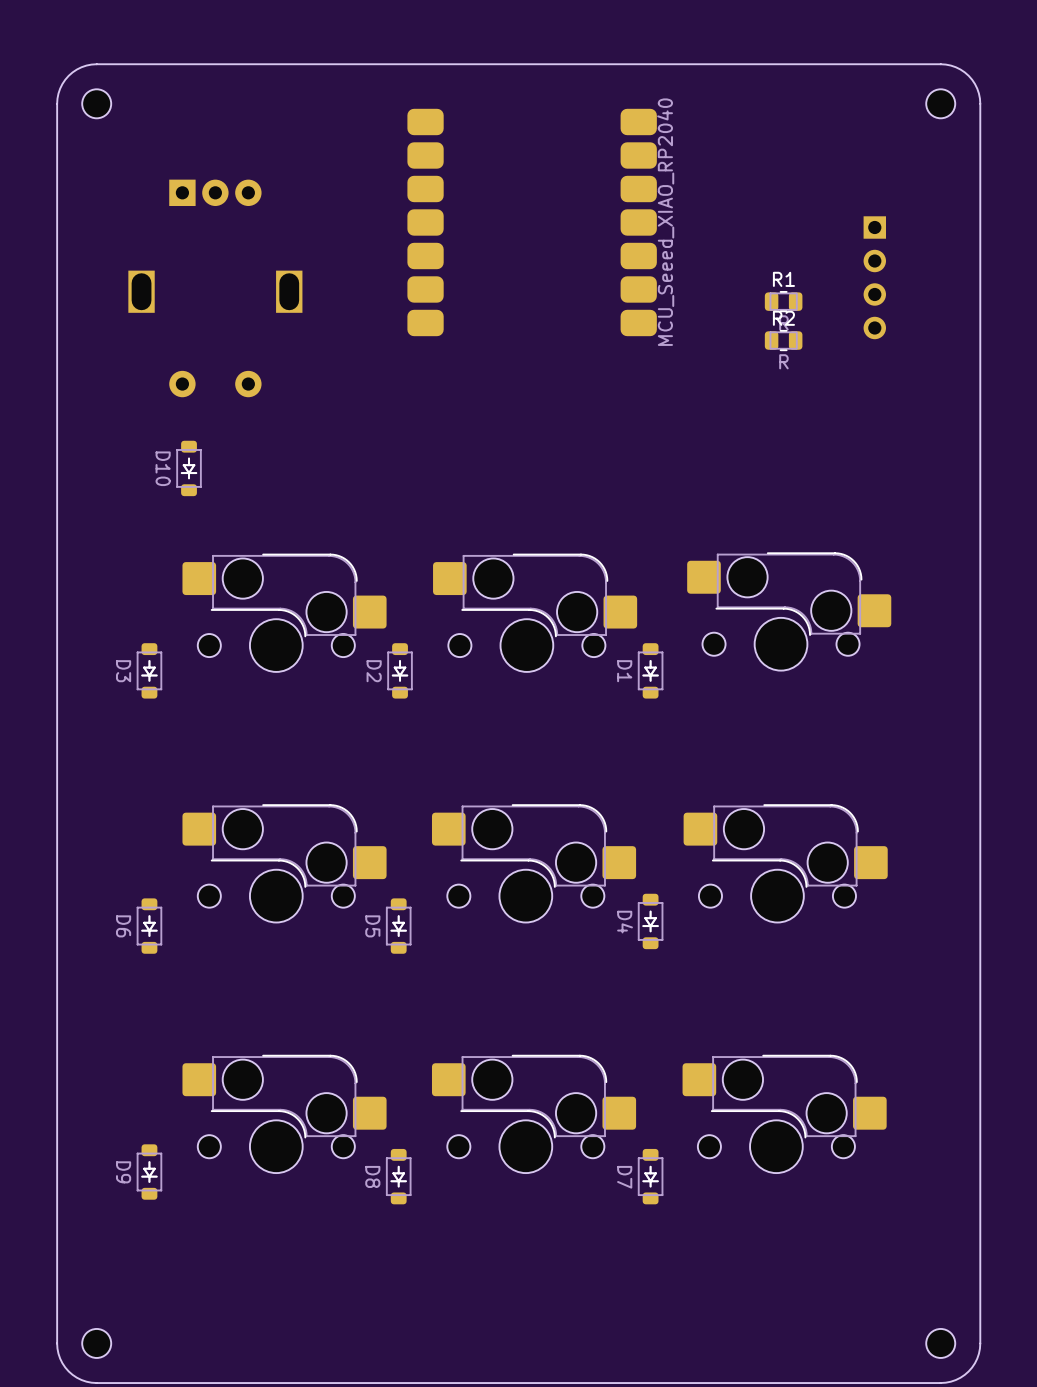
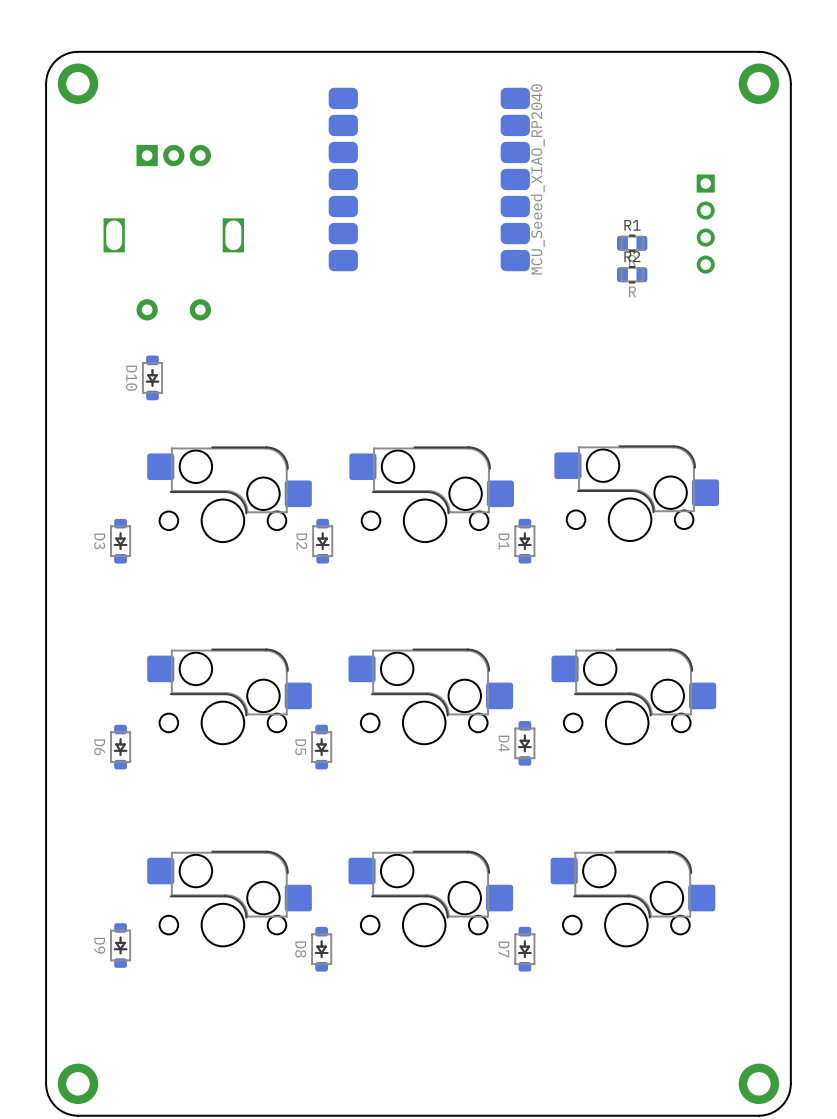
part footprint: [82, 89, 112, 119] -> [57, 63, 99, 104]
part footprint: [926, 89, 956, 119] -> [738, 63, 780, 104]
part footprint: [82, 1328, 112, 1358] -> [57, 1063, 99, 1105]
part footprint: [926, 1328, 956, 1358] -> [738, 1063, 780, 1105]

